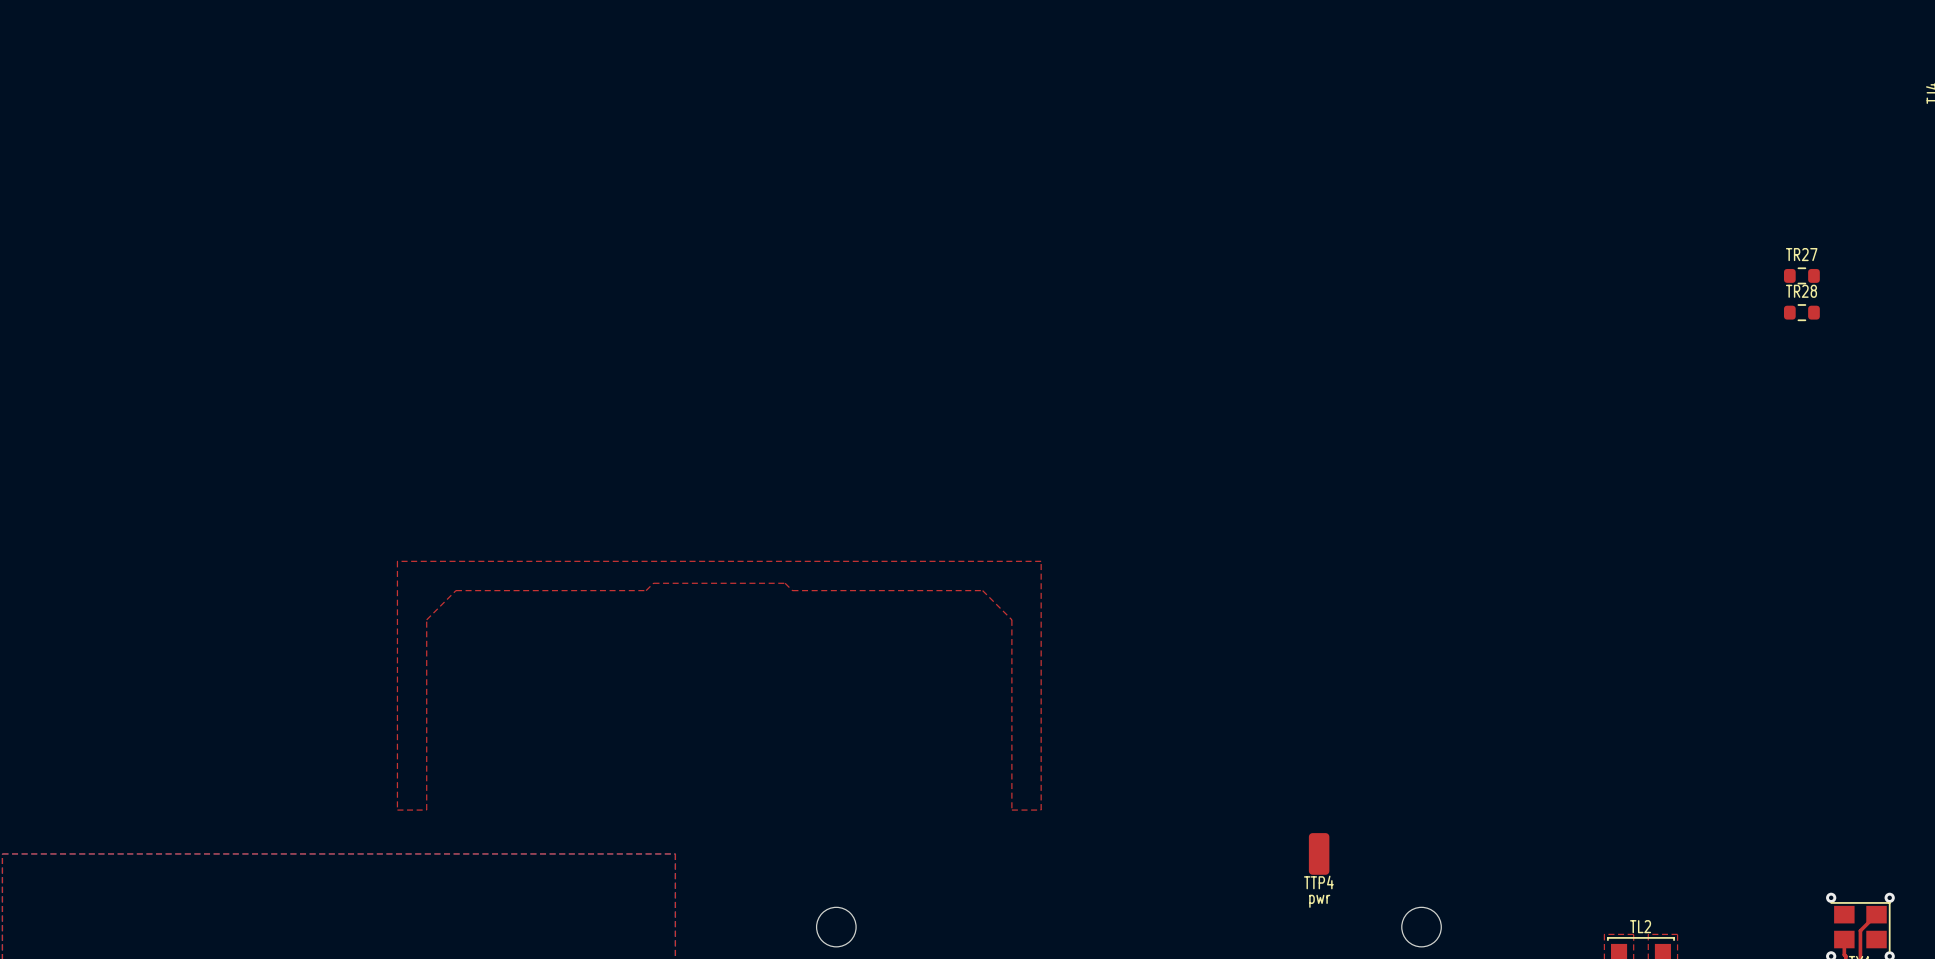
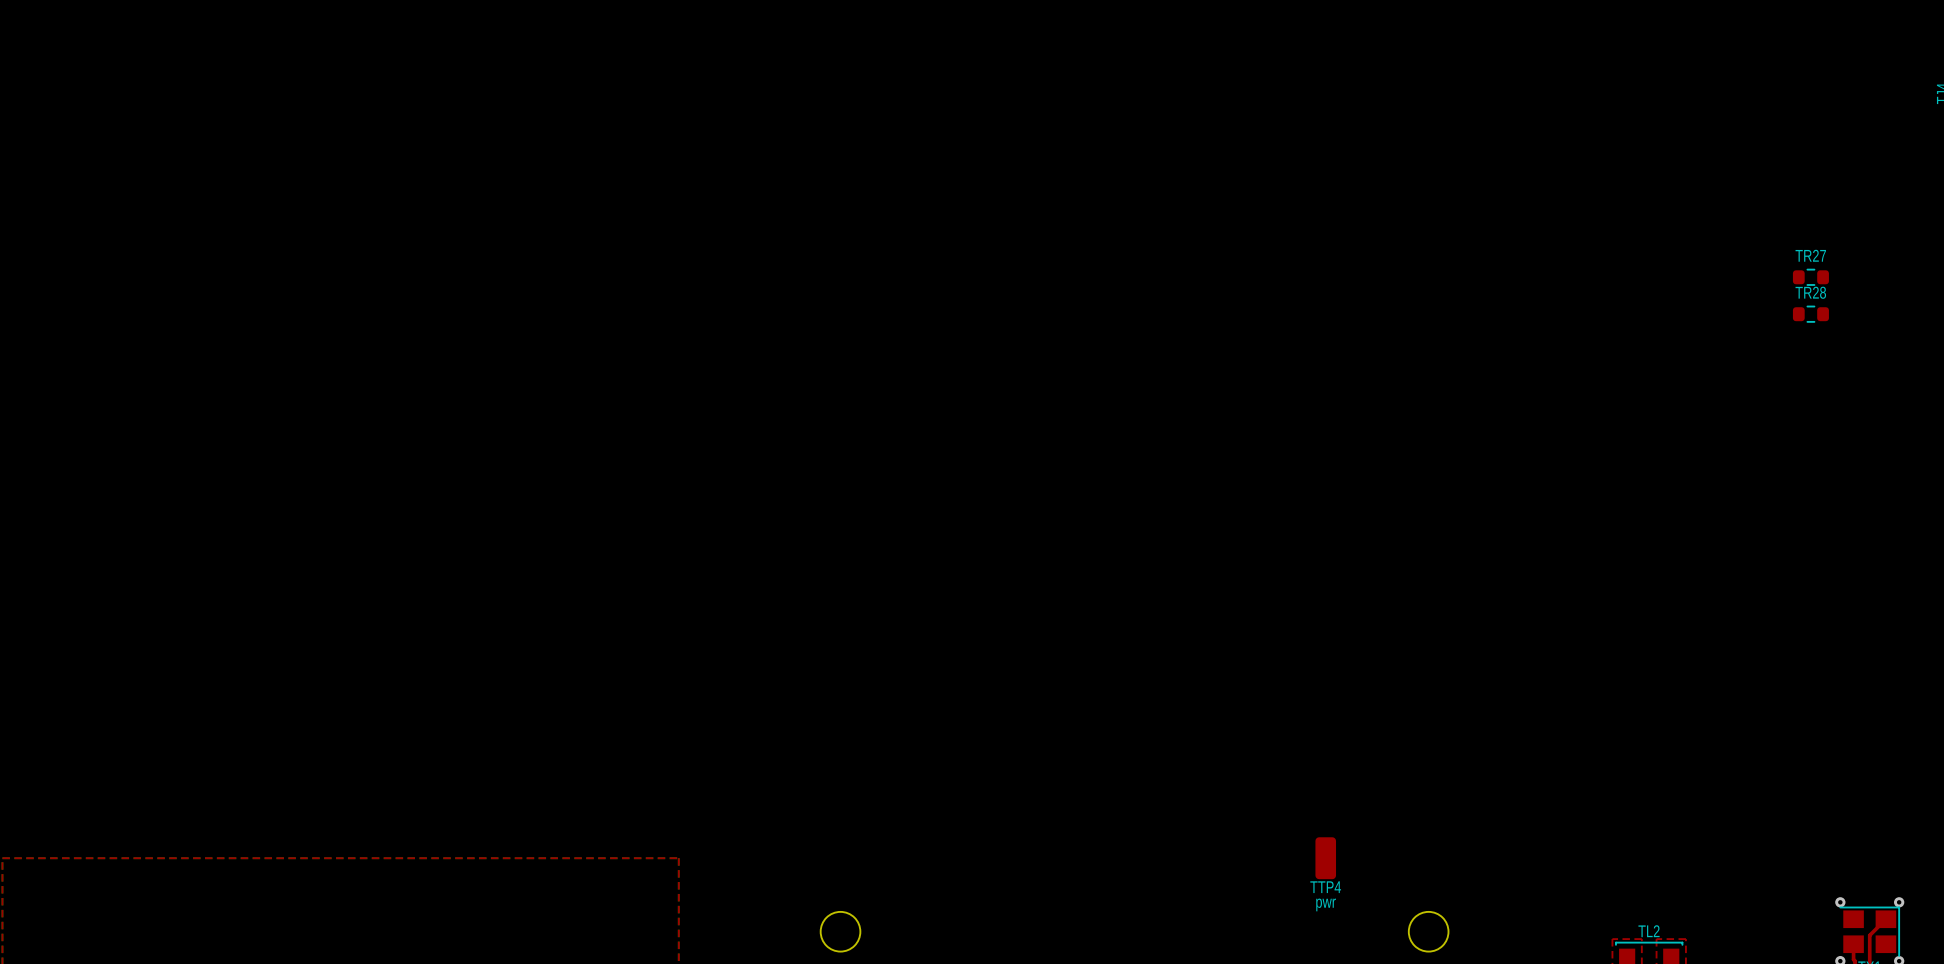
top zone outline: (397, 561) (1041, 561) (1041, 810) (1011, 810) (1011, 619) (982, 590) (792, 590) (785, 583) (653, 583) (646, 590) (455, 590) (426, 619) (426, 810) (397, 810) (397, 561) -> none

